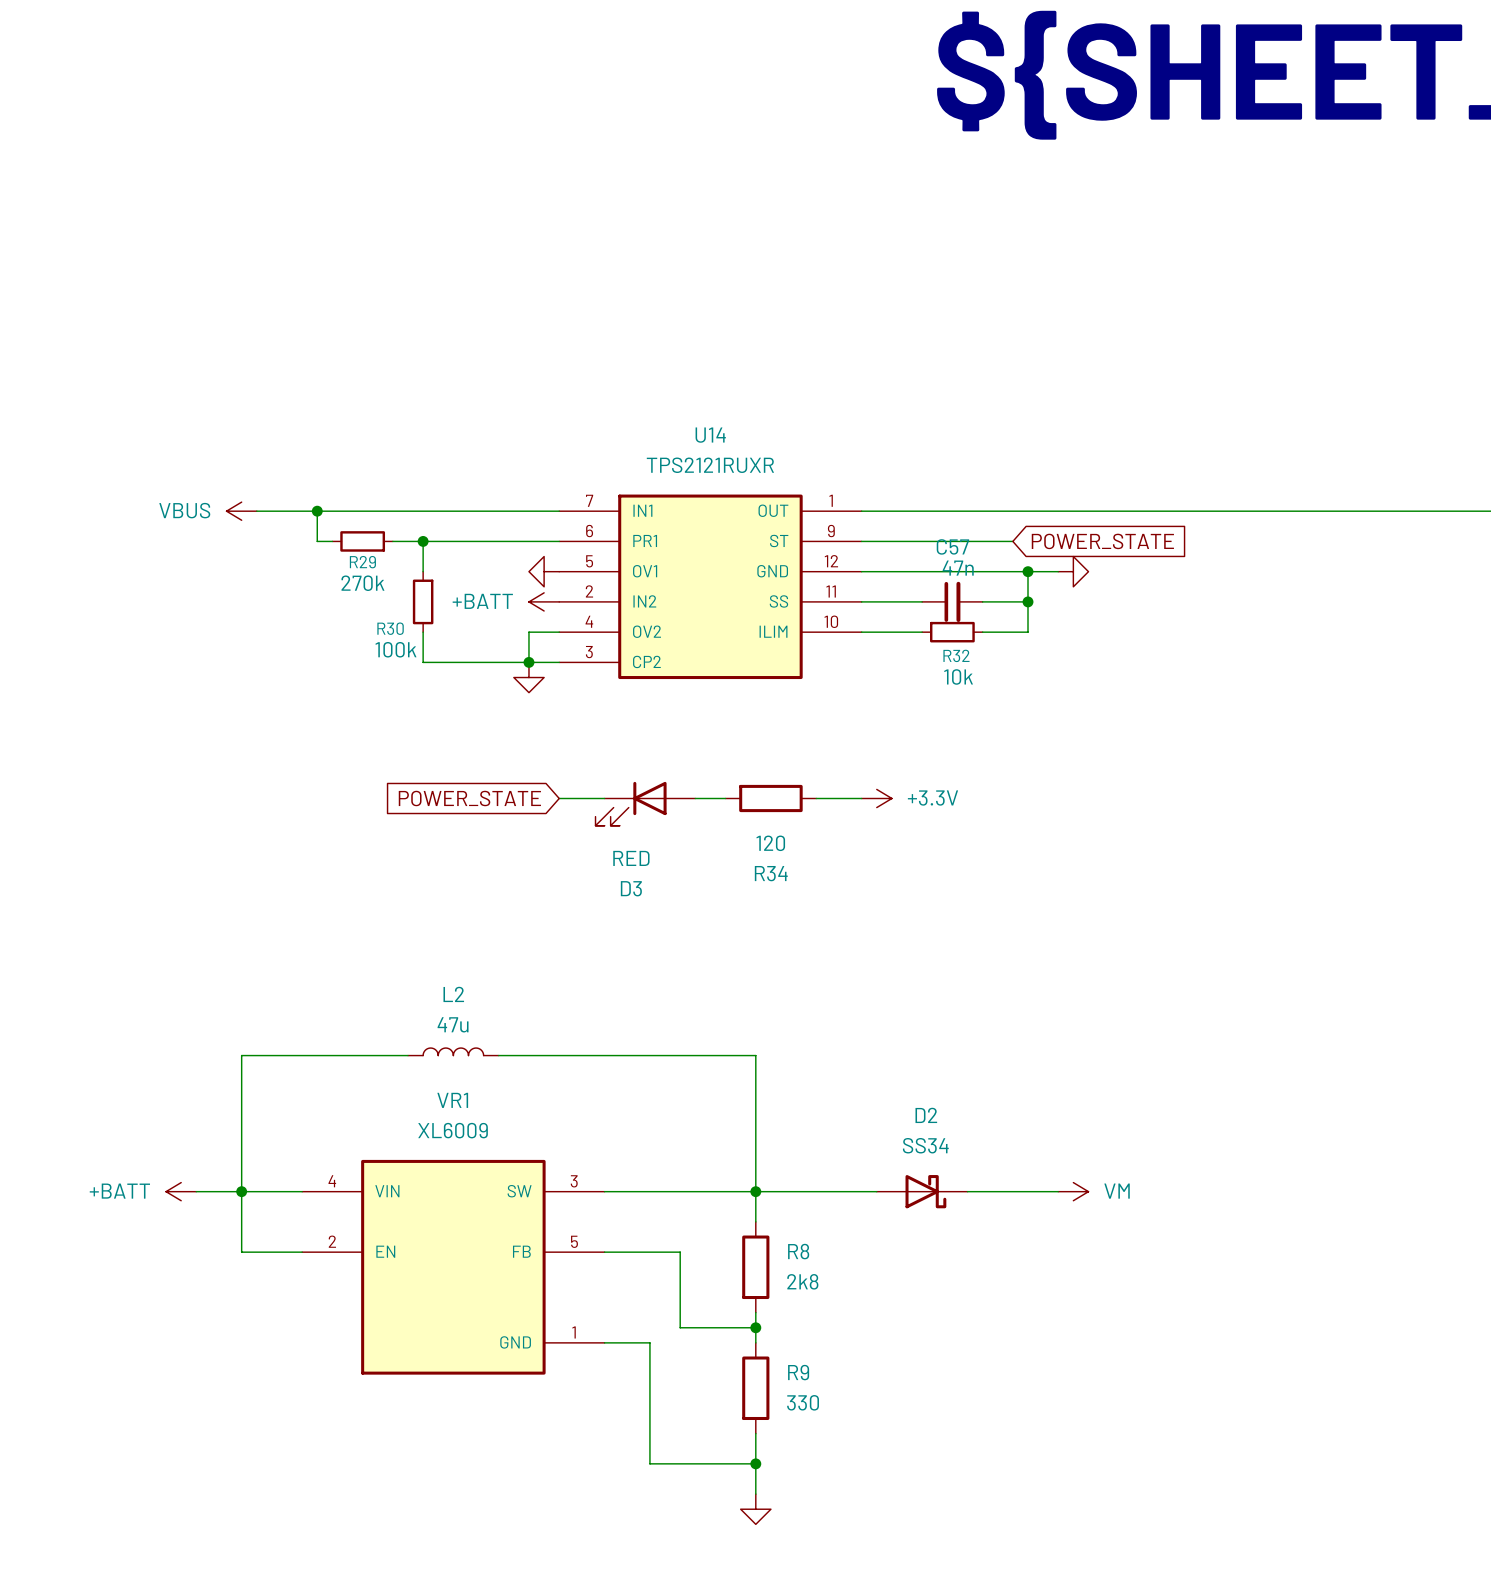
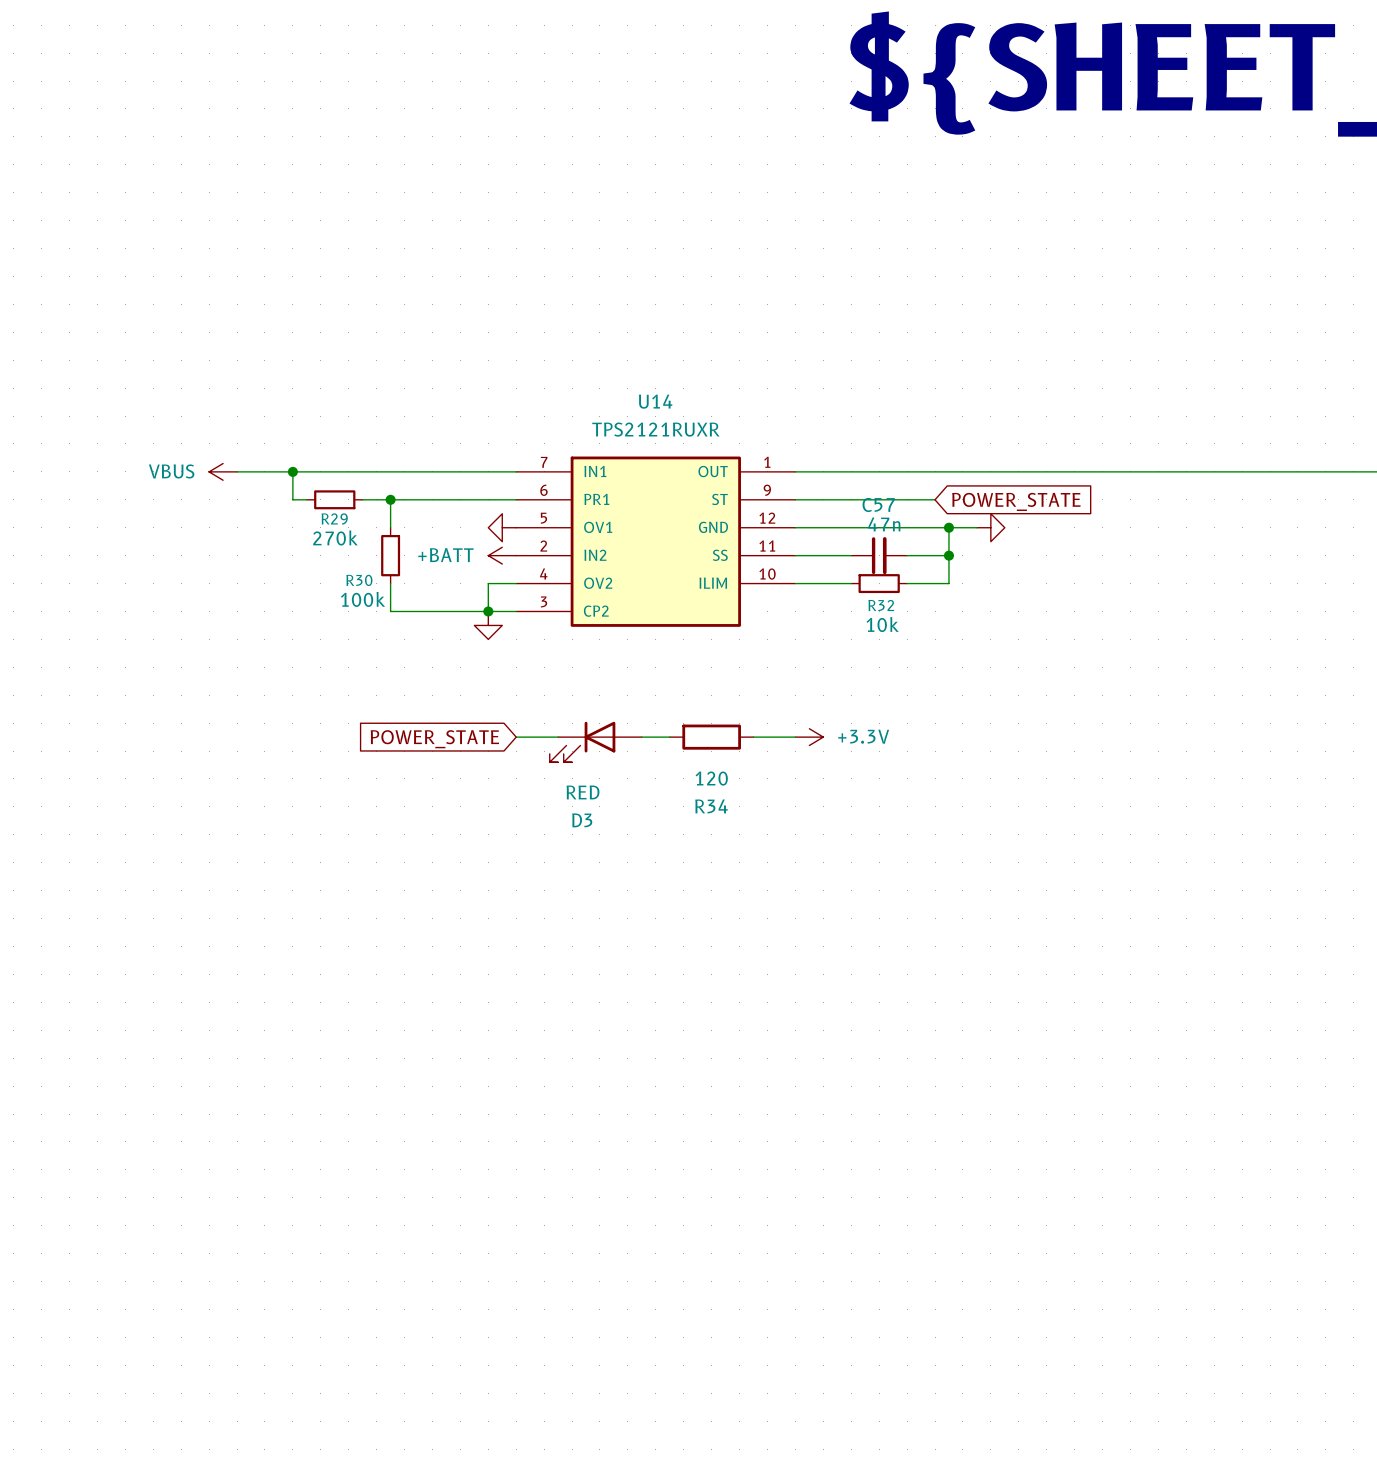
L2: 47u (453, 1051) -> none
wire: (408, 1055) (241, 1055) (241, 1252) (302, 1252) -> none
wire: (498, 1055) (755, 1055) (755, 1221) -> none
power symbol: +BATT (181, 1191) -> none
wire: (196, 1191) (302, 1191) -> none
junction: (241, 1191) -> none
wire: (604, 1191) (876, 1191) -> none
junction: (755, 1191) -> none
D2: SS34 (922, 1191) -> none
wire: (967, 1191) (1058, 1191) -> none
power symbol: VM (1073, 1191) -> none
wire: (604, 1252) (680, 1252) (680, 1327) (755, 1327) -> none
VR1: XL6009 (453, 1267) -> none
R8: 2k8 (755, 1267) -> none
wire: (755, 1312) (755, 1342) -> none
junction: (755, 1327) -> none
wire: (604, 1342) (649, 1342) (649, 1463) (755, 1463) -> none
R9: 330 (755, 1388) -> none
wire: (755, 1433) (755, 1494) -> none
junction: (755, 1463) -> none
power symbol: (755, 1509) -> none

